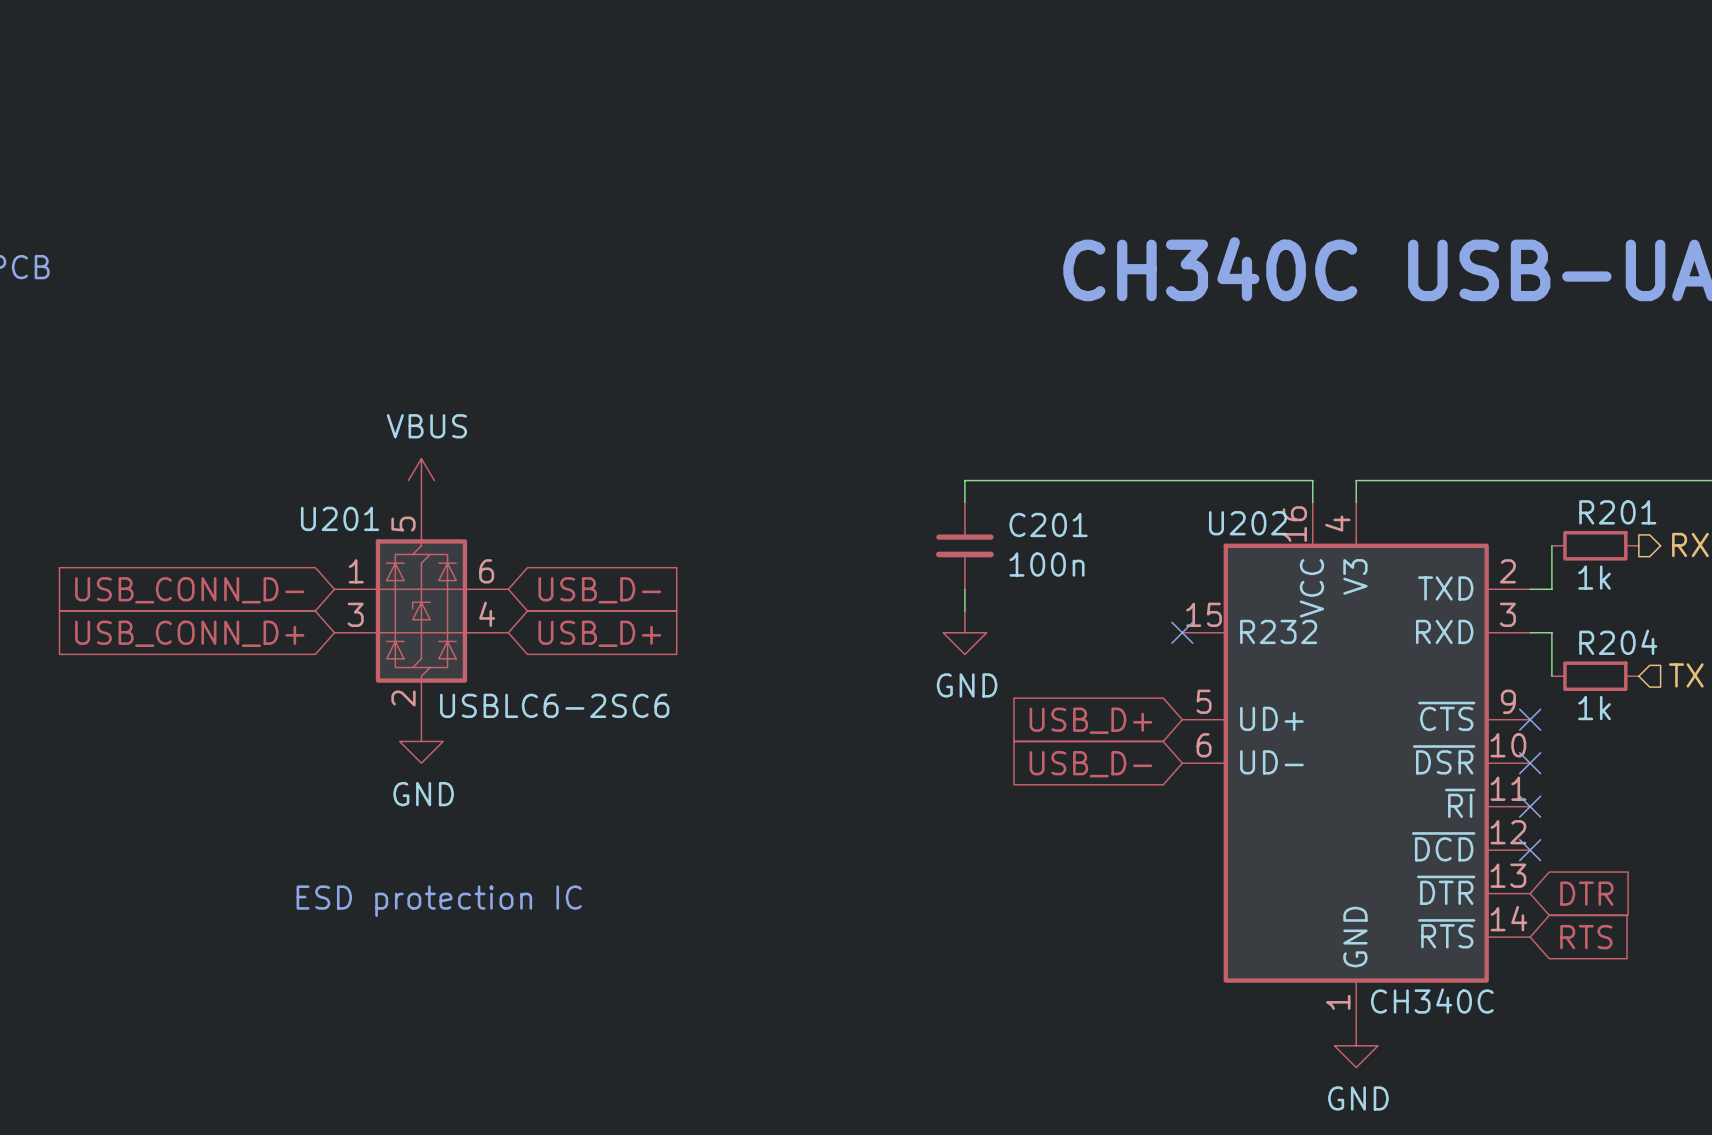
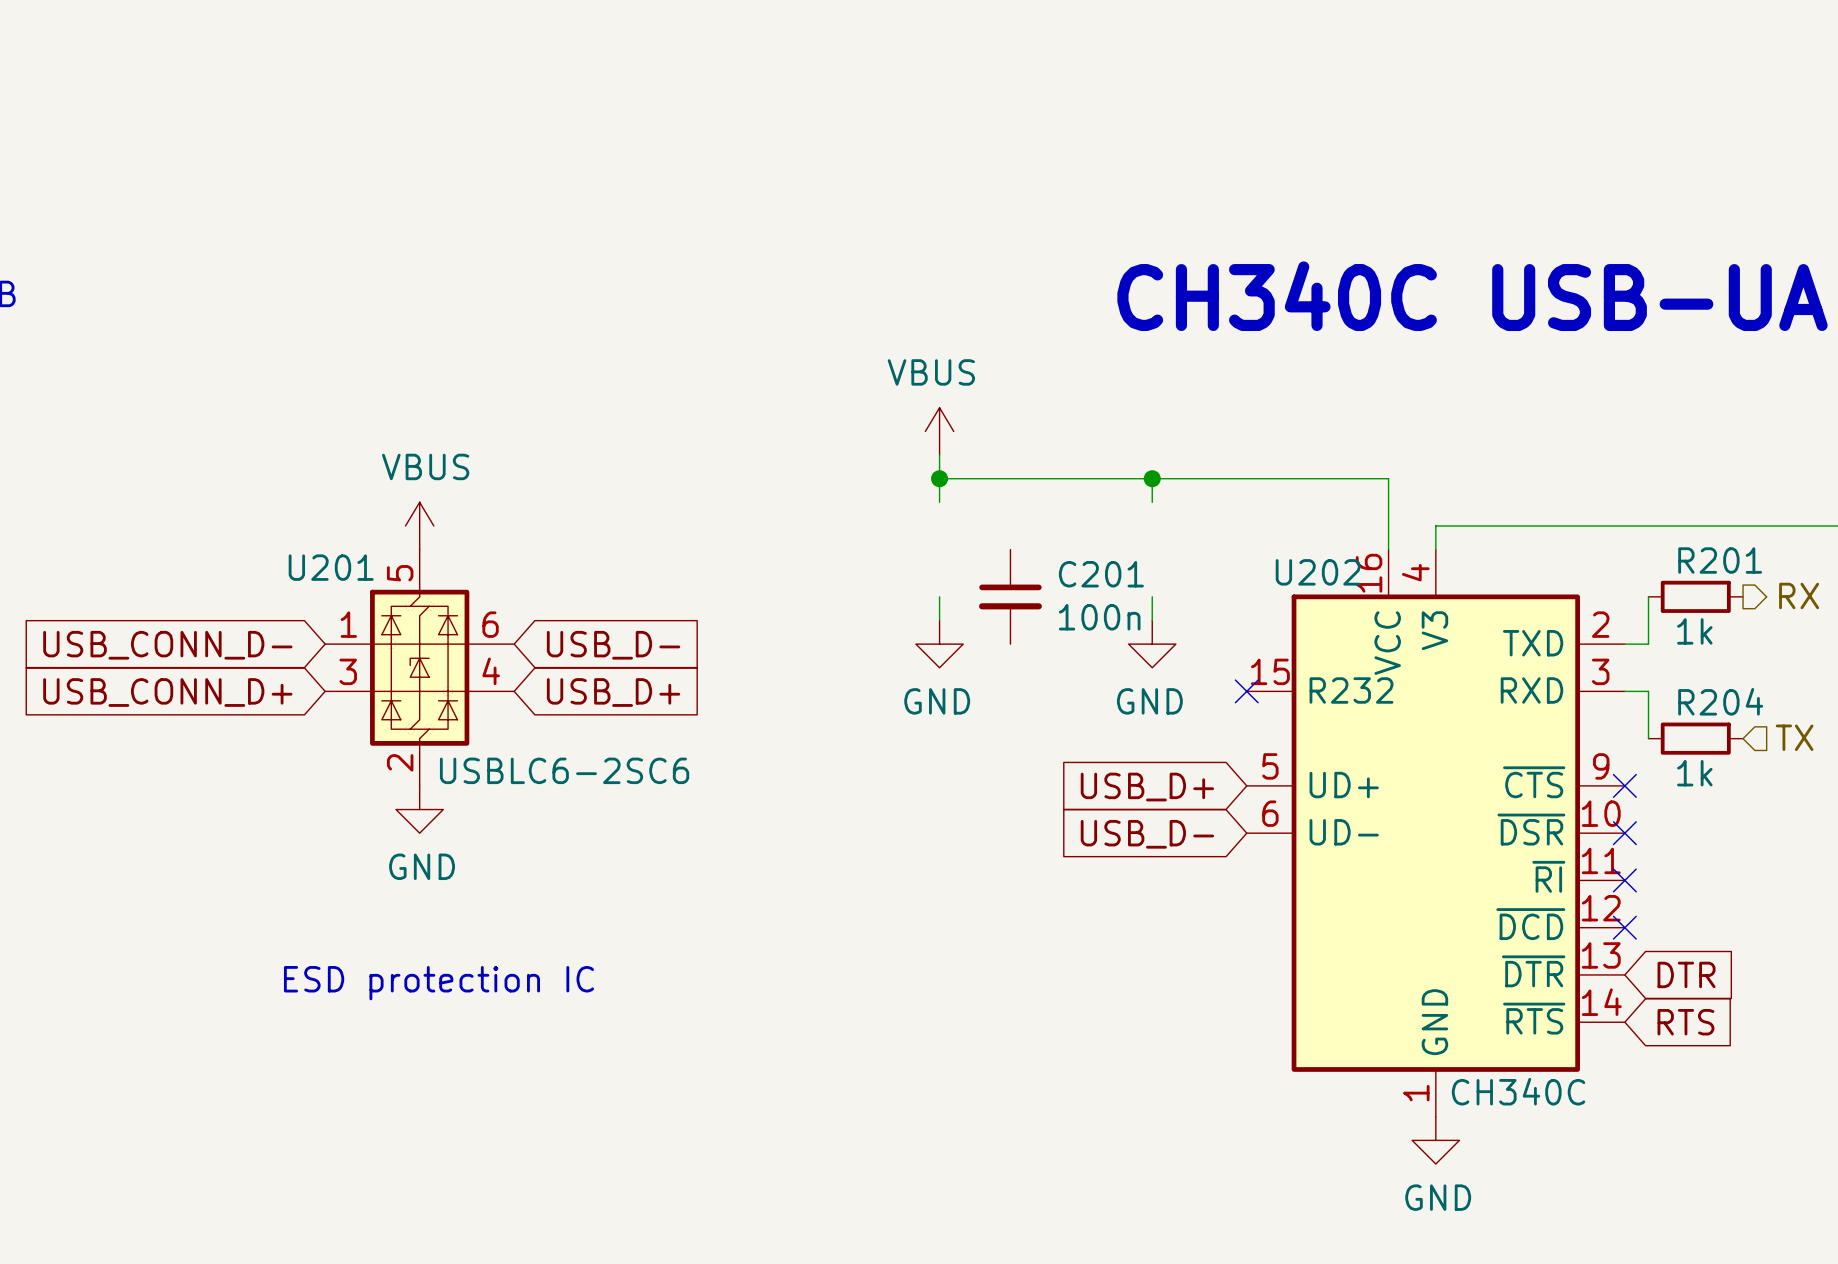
power symbol: none -> VBUS (939, 431)
wire: none -> (939, 455) (939, 502)
junction: none -> (939, 478)
wire: none -> (1152, 478) (1152, 502)
junction: none -> (1152, 478)
wire: (1312, 480) (964, 480) (964, 502) -> (1388, 525) (1388, 478) (939, 478)
wire: none -> (1152, 596) (1152, 620)
power symbol: none -> GND (939, 644)
wire: (964, 589) (964, 611) -> (939, 596) (939, 620)
power symbol: none -> GND (1152, 644)
power symbol: GND (964, 632) -> none

